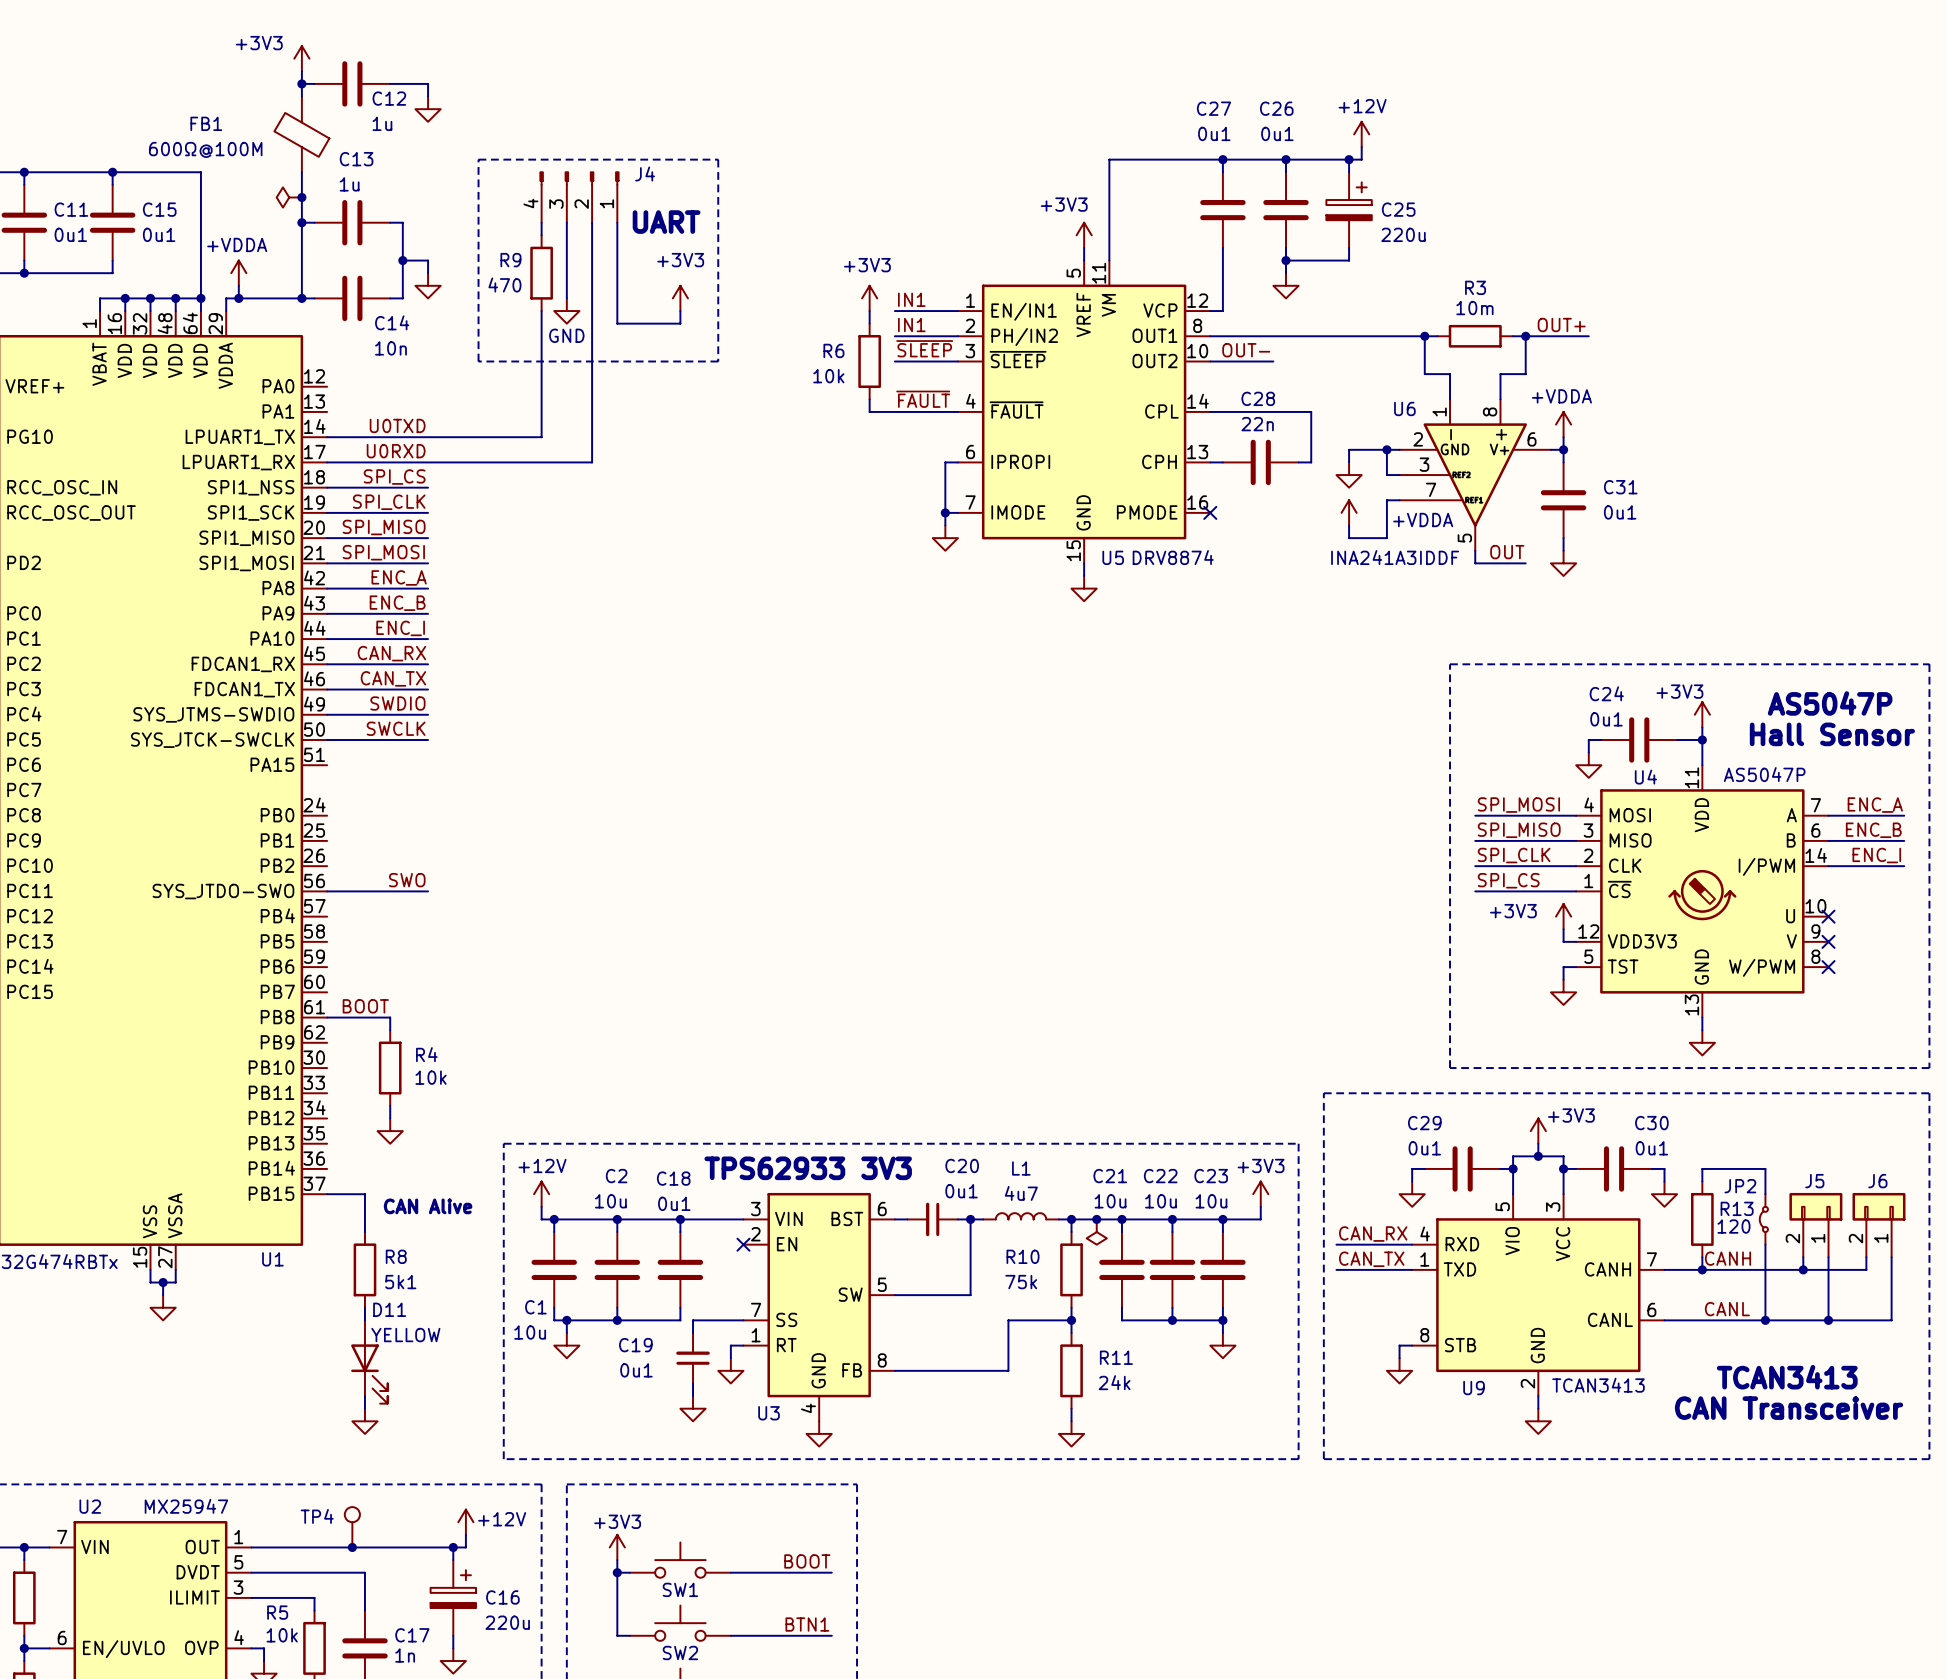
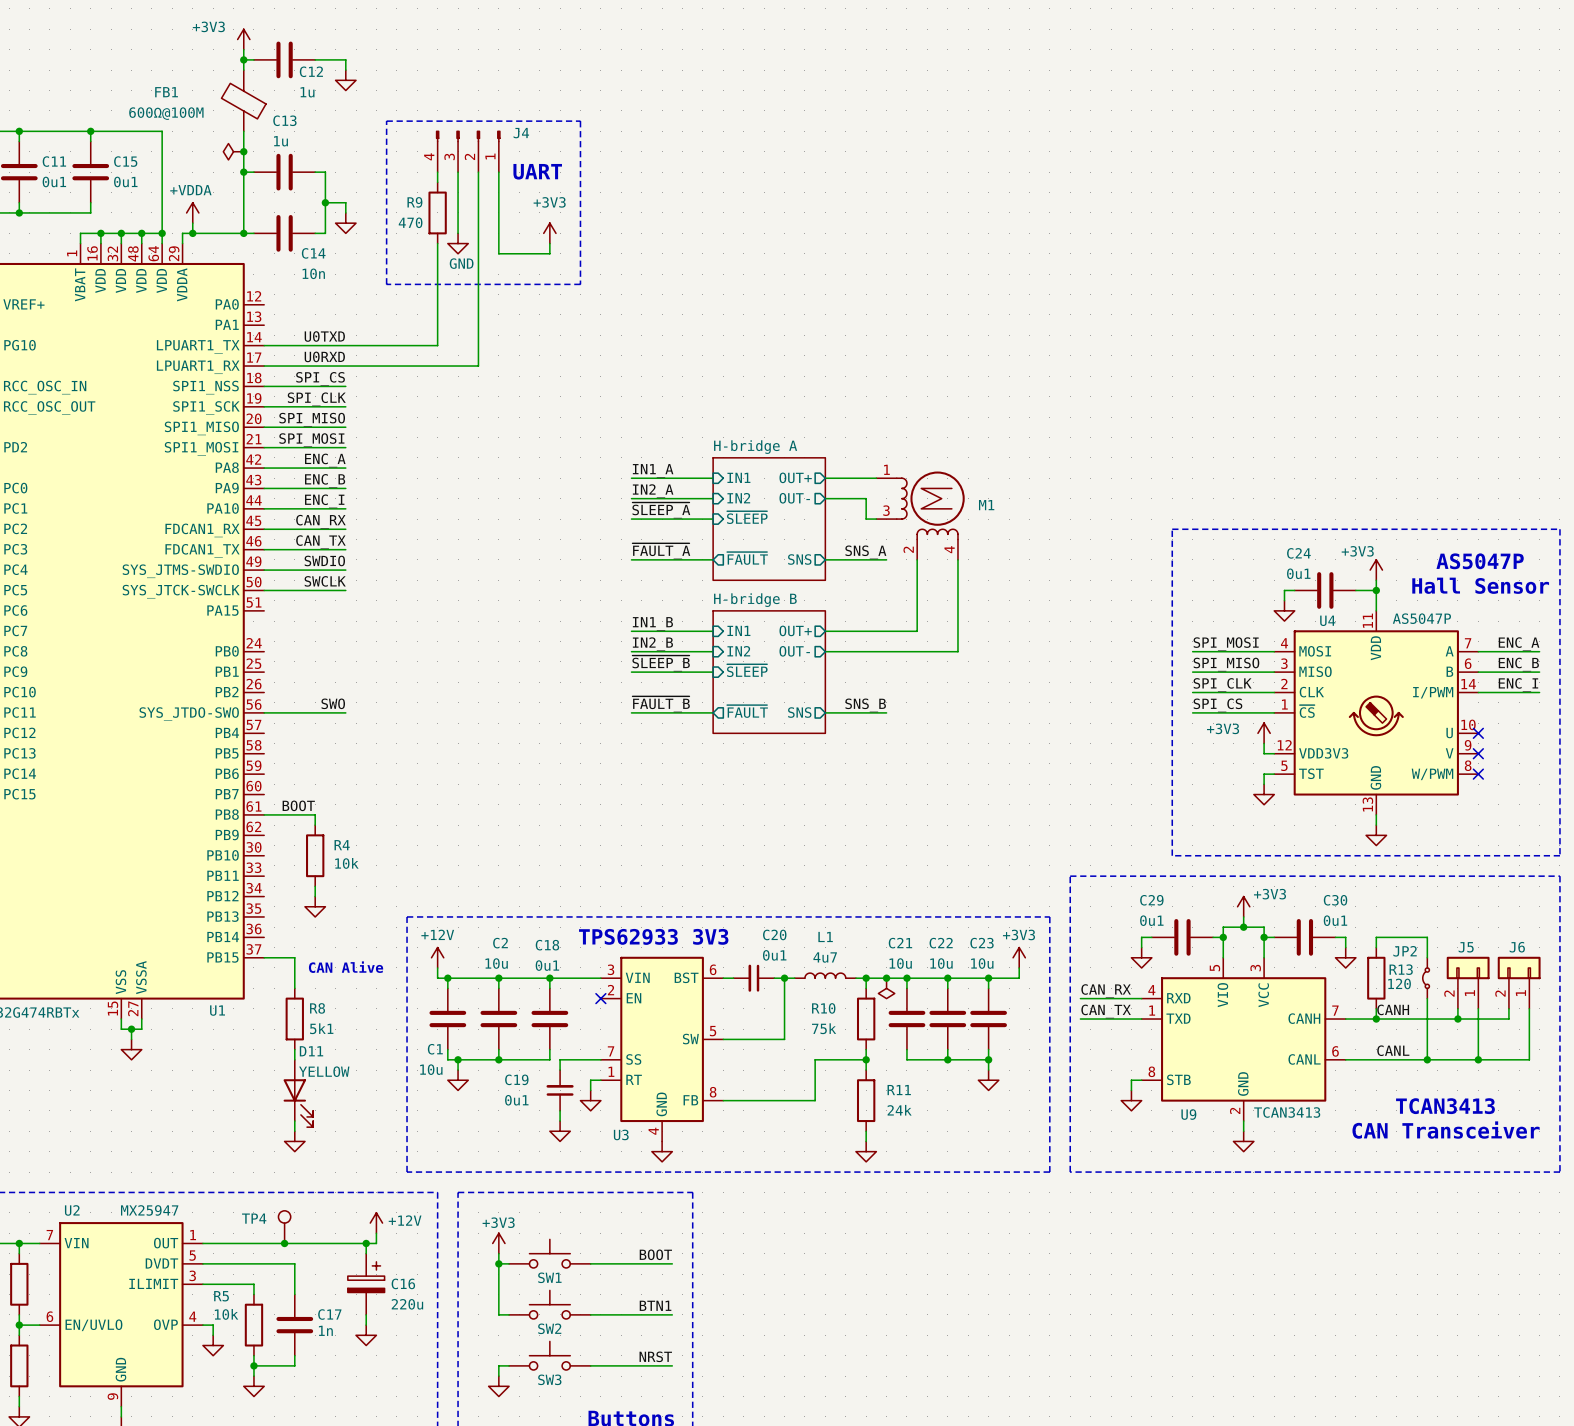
power symbol: +12V (1361, 134) -> none
wire: (1361, 147) (1361, 159) (1109, 159) (1109, 260) -> none
wire: (1222, 159) (1222, 172) -> none
junction: (1222, 159) -> none
wire: (1286, 159) (1286, 172) -> none
junction: (1286, 159) -> none
wire: (1349, 159) (1349, 172) -> none
junction: (1349, 159) -> none
C27: 0u1 (1222, 210) -> none
C26: 0u1 (1286, 210) -> none
C25: 220u (1349, 210) -> none
power symbol: +3V3 (1084, 235) -> none
wire: (1084, 247) (1084, 260) -> none
wire: (1222, 247) (1222, 311) (1210, 311) -> none
wire: (1286, 247) (1286, 273) -> none
wire: (1349, 247) (1349, 260) (1286, 260) -> none
junction: (1286, 260) -> none
power symbol: (1286, 285) -> none
power symbol: +3V3 (869, 298) -> none
label: IN1 (911, 299) -> none
wire: (869, 311) (869, 323) -> none
wire: (894, 311) (957, 311) -> none
label: IN1 (911, 325) -> none
label: OUT+ (1561, 325) -> none
wire: (894, 336) (957, 336) -> none
wire: (1210, 336) (1437, 336) -> none
wire: (1424, 336) (1424, 374) (1450, 374) (1450, 399) -> none
junction: (1424, 336) -> none
R3: 10m (1475, 336) -> none
wire: (1513, 336) (1588, 336) -> none
wire: (1525, 336) (1525, 374) (1500, 374) (1500, 399) -> none
junction: (1525, 336) -> none
label: ~{SLEEP} (924, 348) -> none
label: OUT- (1246, 350) -> none
R6: 10k (869, 361) -> none
wire: (894, 361) (957, 361) -> none
wire: (1210, 361) (1273, 361) -> none
wire: (869, 399) (869, 411) (957, 411) -> none
label: ~{FAULT} (923, 399) -> none
U5: DRV8874 (1084, 411) -> none
wire: (1210, 411) (1311, 411) (1311, 462) (1298, 462) -> none
power symbol: +VDDA (1563, 424) -> none
wire: (1563, 437) (1563, 462) -> none
wire: (1386, 449) (1386, 475) (1399, 475) -> none
junction: (1386, 449) -> none
wire: (1399, 449) (1349, 449) (1349, 462) -> none
wire: (1550, 449) (1563, 449) -> none
junction: (1563, 449) -> none
wire: (957, 462) (945, 462) (945, 525) -> none
wire: (1210, 462) (1222, 462) -> none
C28: 22n (1260, 462) -> none
power symbol: (1349, 475) -> none
U6: INA241A3IDDF (1475, 475) -> none
wire: (1399, 500) (1386, 500) (1386, 538) (1349, 538) (1349, 525) -> none
C31: 0u1 (1563, 500) -> none
wire: (945, 512) (957, 512) -> none
junction: (945, 512) -> none
no-connect mark: (1210, 512) -> none
power symbol: +VDDA (1349, 512) -> none
power symbol: (945, 538) -> none
wire: (1563, 538) (1563, 550) -> none
wire: (1475, 550) (1475, 563) (1525, 563) -> none
label: OUT (1507, 552) -> none
wire: (1084, 563) (1084, 575) -> none
power symbol: (1563, 563) -> none
power symbol: (1084, 588) -> none
label: none -> IN1_A (653, 470)
sheet pin: none -> IN1 (738, 477)
sheet pin: none -> OUT+ (795, 477)
wire: none -> (631, 478) (713, 478)
wire: none -> (825, 478) (876, 478)
label: none -> IN2_A (653, 491)
sheet pin: none -> IN2 (738, 498)
sheet pin: none -> OUT- (794, 498)
wire: none -> (631, 498) (713, 498)
wire: none -> (825, 498) (866, 498) (866, 519) (876, 519)
label: none -> ~{SLEEP_A} (661, 510)
M1: none -> (920, 515)
sheet pin: none -> ~{SLEEP} (747, 517)
wire: none -> (631, 519) (713, 519)
sheet H-bridge A: none -> (769, 519)
label: none -> ~{FAULT_A} (661, 551)
label: none -> SNS_A (865, 552)
sheet pin: none -> ~{FAULT} (747, 558)
sheet pin: none -> SNS (799, 559)
wire: none -> (631, 559) (713, 559)
wire: none -> (825, 559) (886, 559)
wire: none -> (917, 559) (917, 631) (825, 631)
wire: none -> (957, 559) (957, 651) (825, 651)
label: none -> IN1_B (652, 623)
sheet pin: none -> IN1 (738, 630)
sheet pin: none -> OUT+ (795, 630)
wire: none -> (631, 631) (713, 631)
label: none -> IN2_B (652, 644)
wire: none -> (631, 651) (713, 651)
sheet pin: none -> IN2 (738, 651)
sheet pin: none -> OUT- (794, 651)
label: none -> ~{SLEEP_B} (661, 663)
sheet pin: none -> ~{SLEEP} (747, 670)
wire: none -> (631, 672) (713, 672)
sheet H-bridge B: none -> (769, 672)
label: none -> ~{FAULT_B} (661, 704)
label: none -> SNS_B (865, 705)
sheet pin: none -> ~{FAULT} (747, 711)
sheet pin: none -> SNS (799, 712)
wire: none -> (631, 712) (713, 712)
wire: none -> (825, 712) (886, 712)

